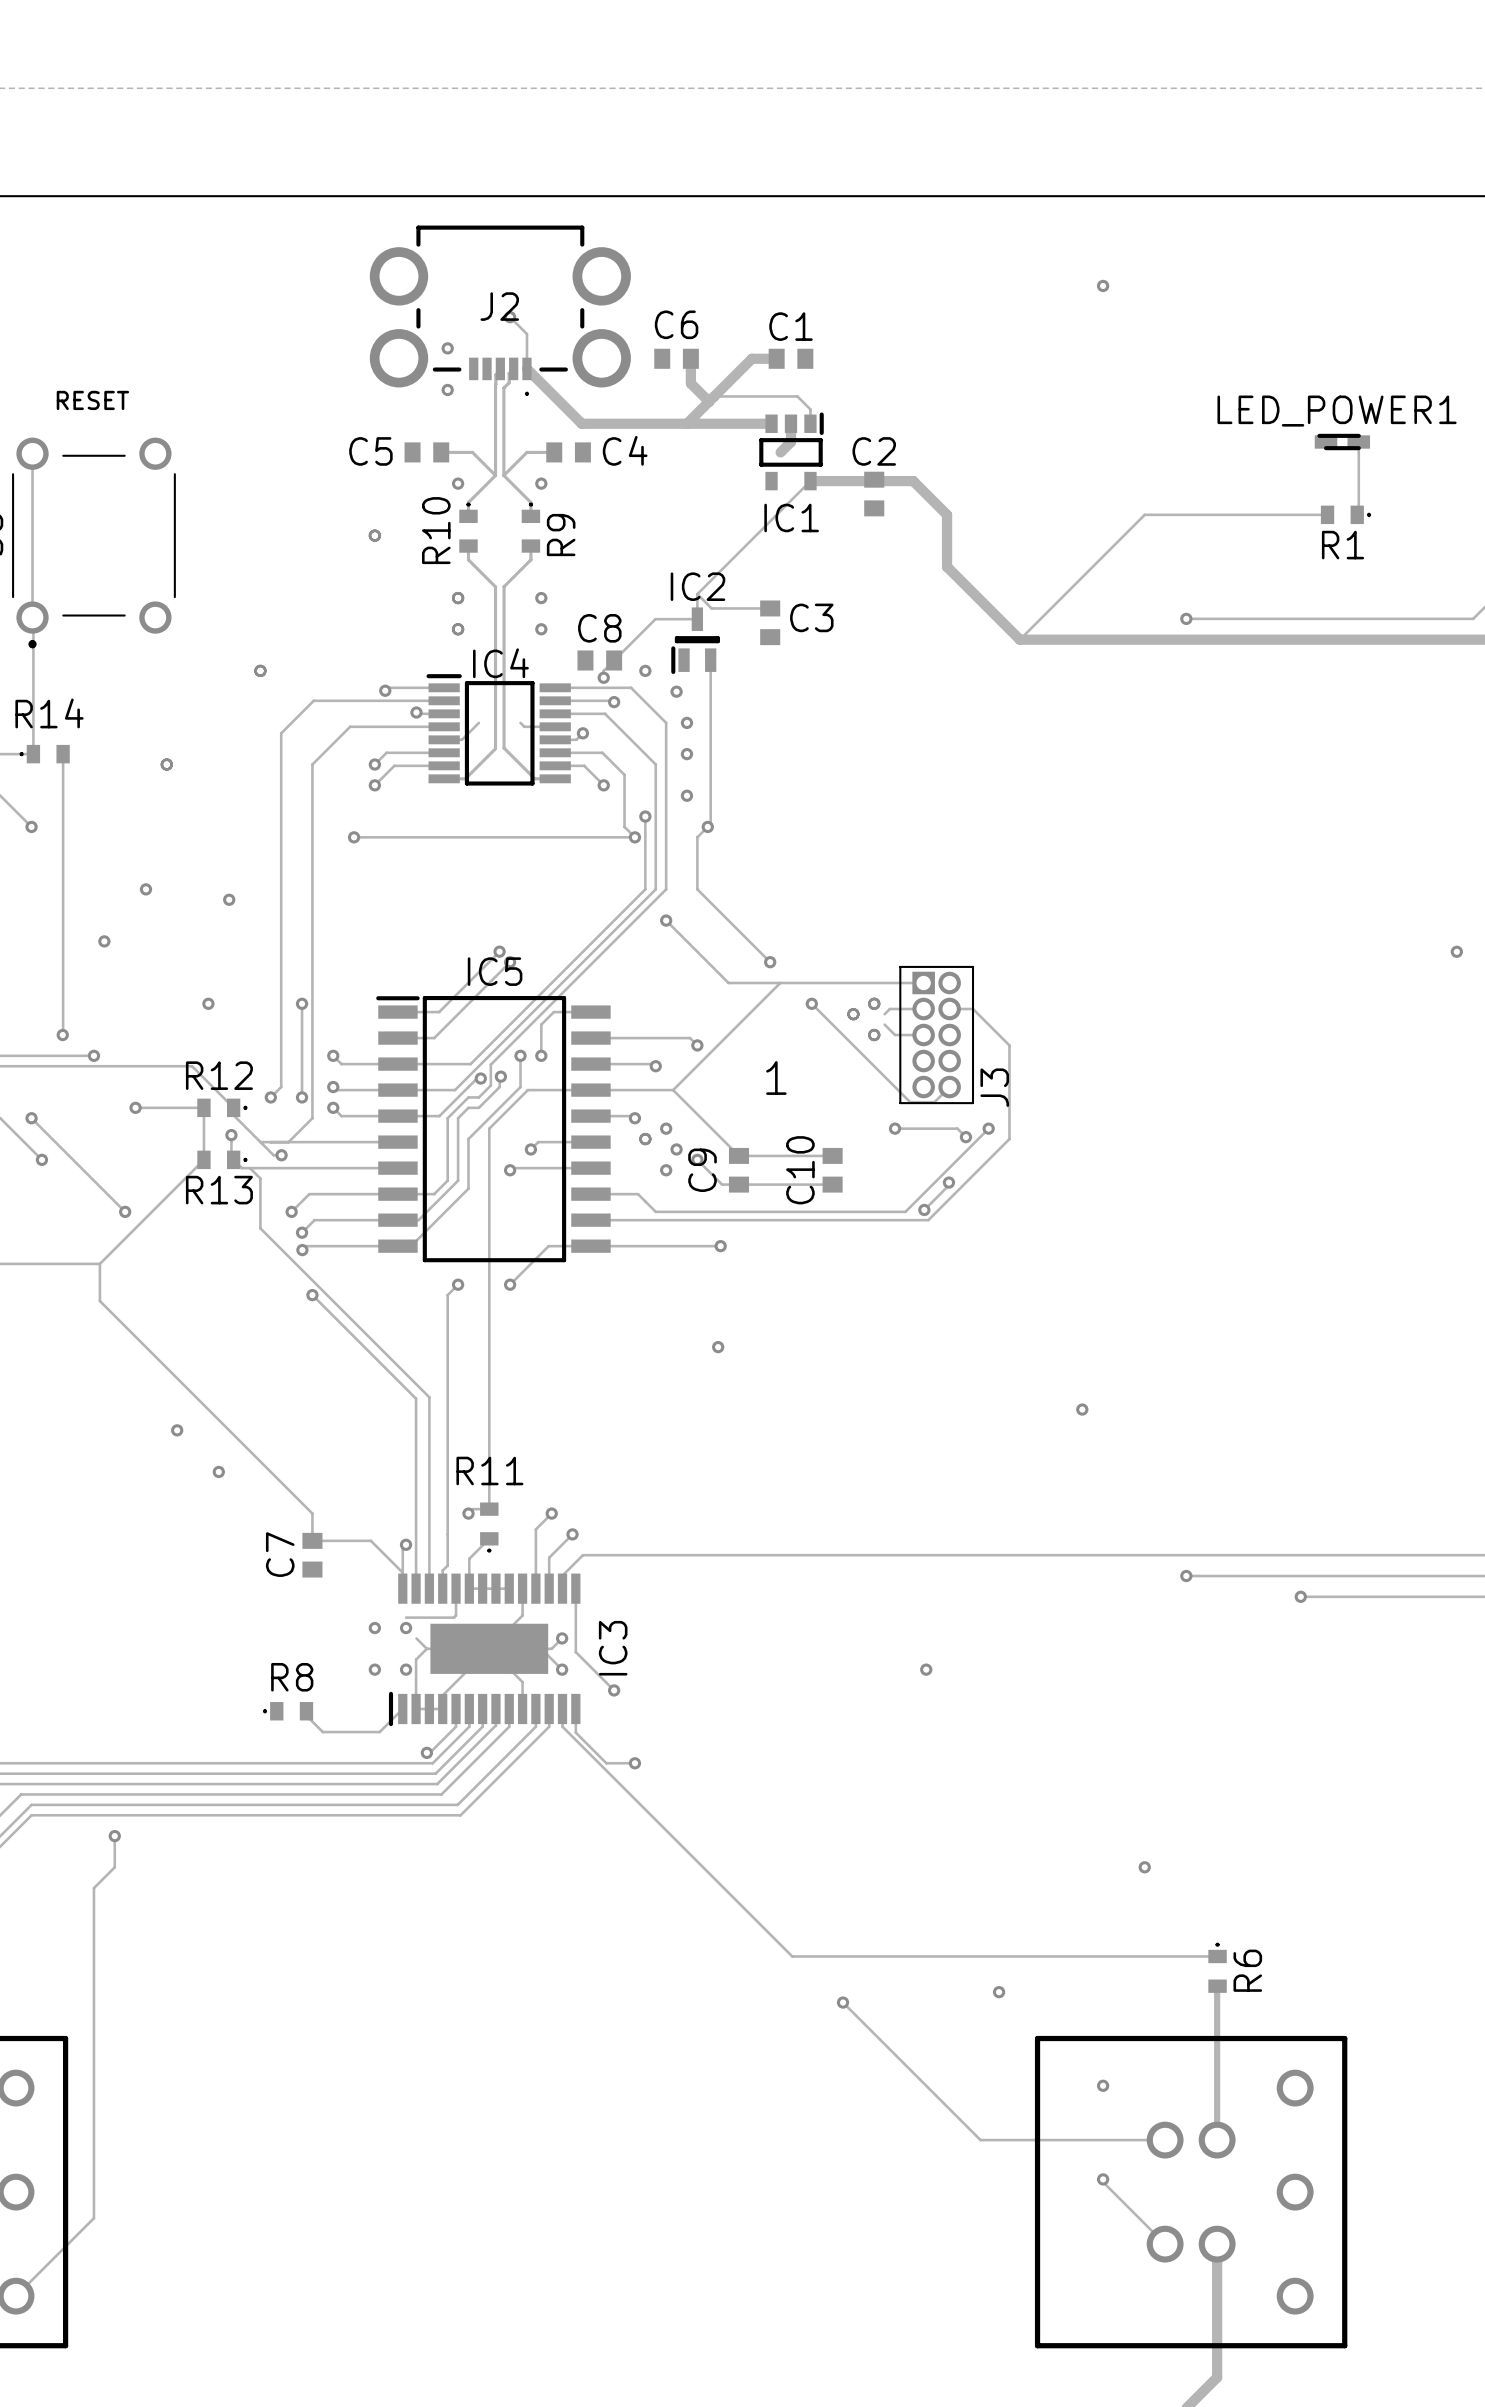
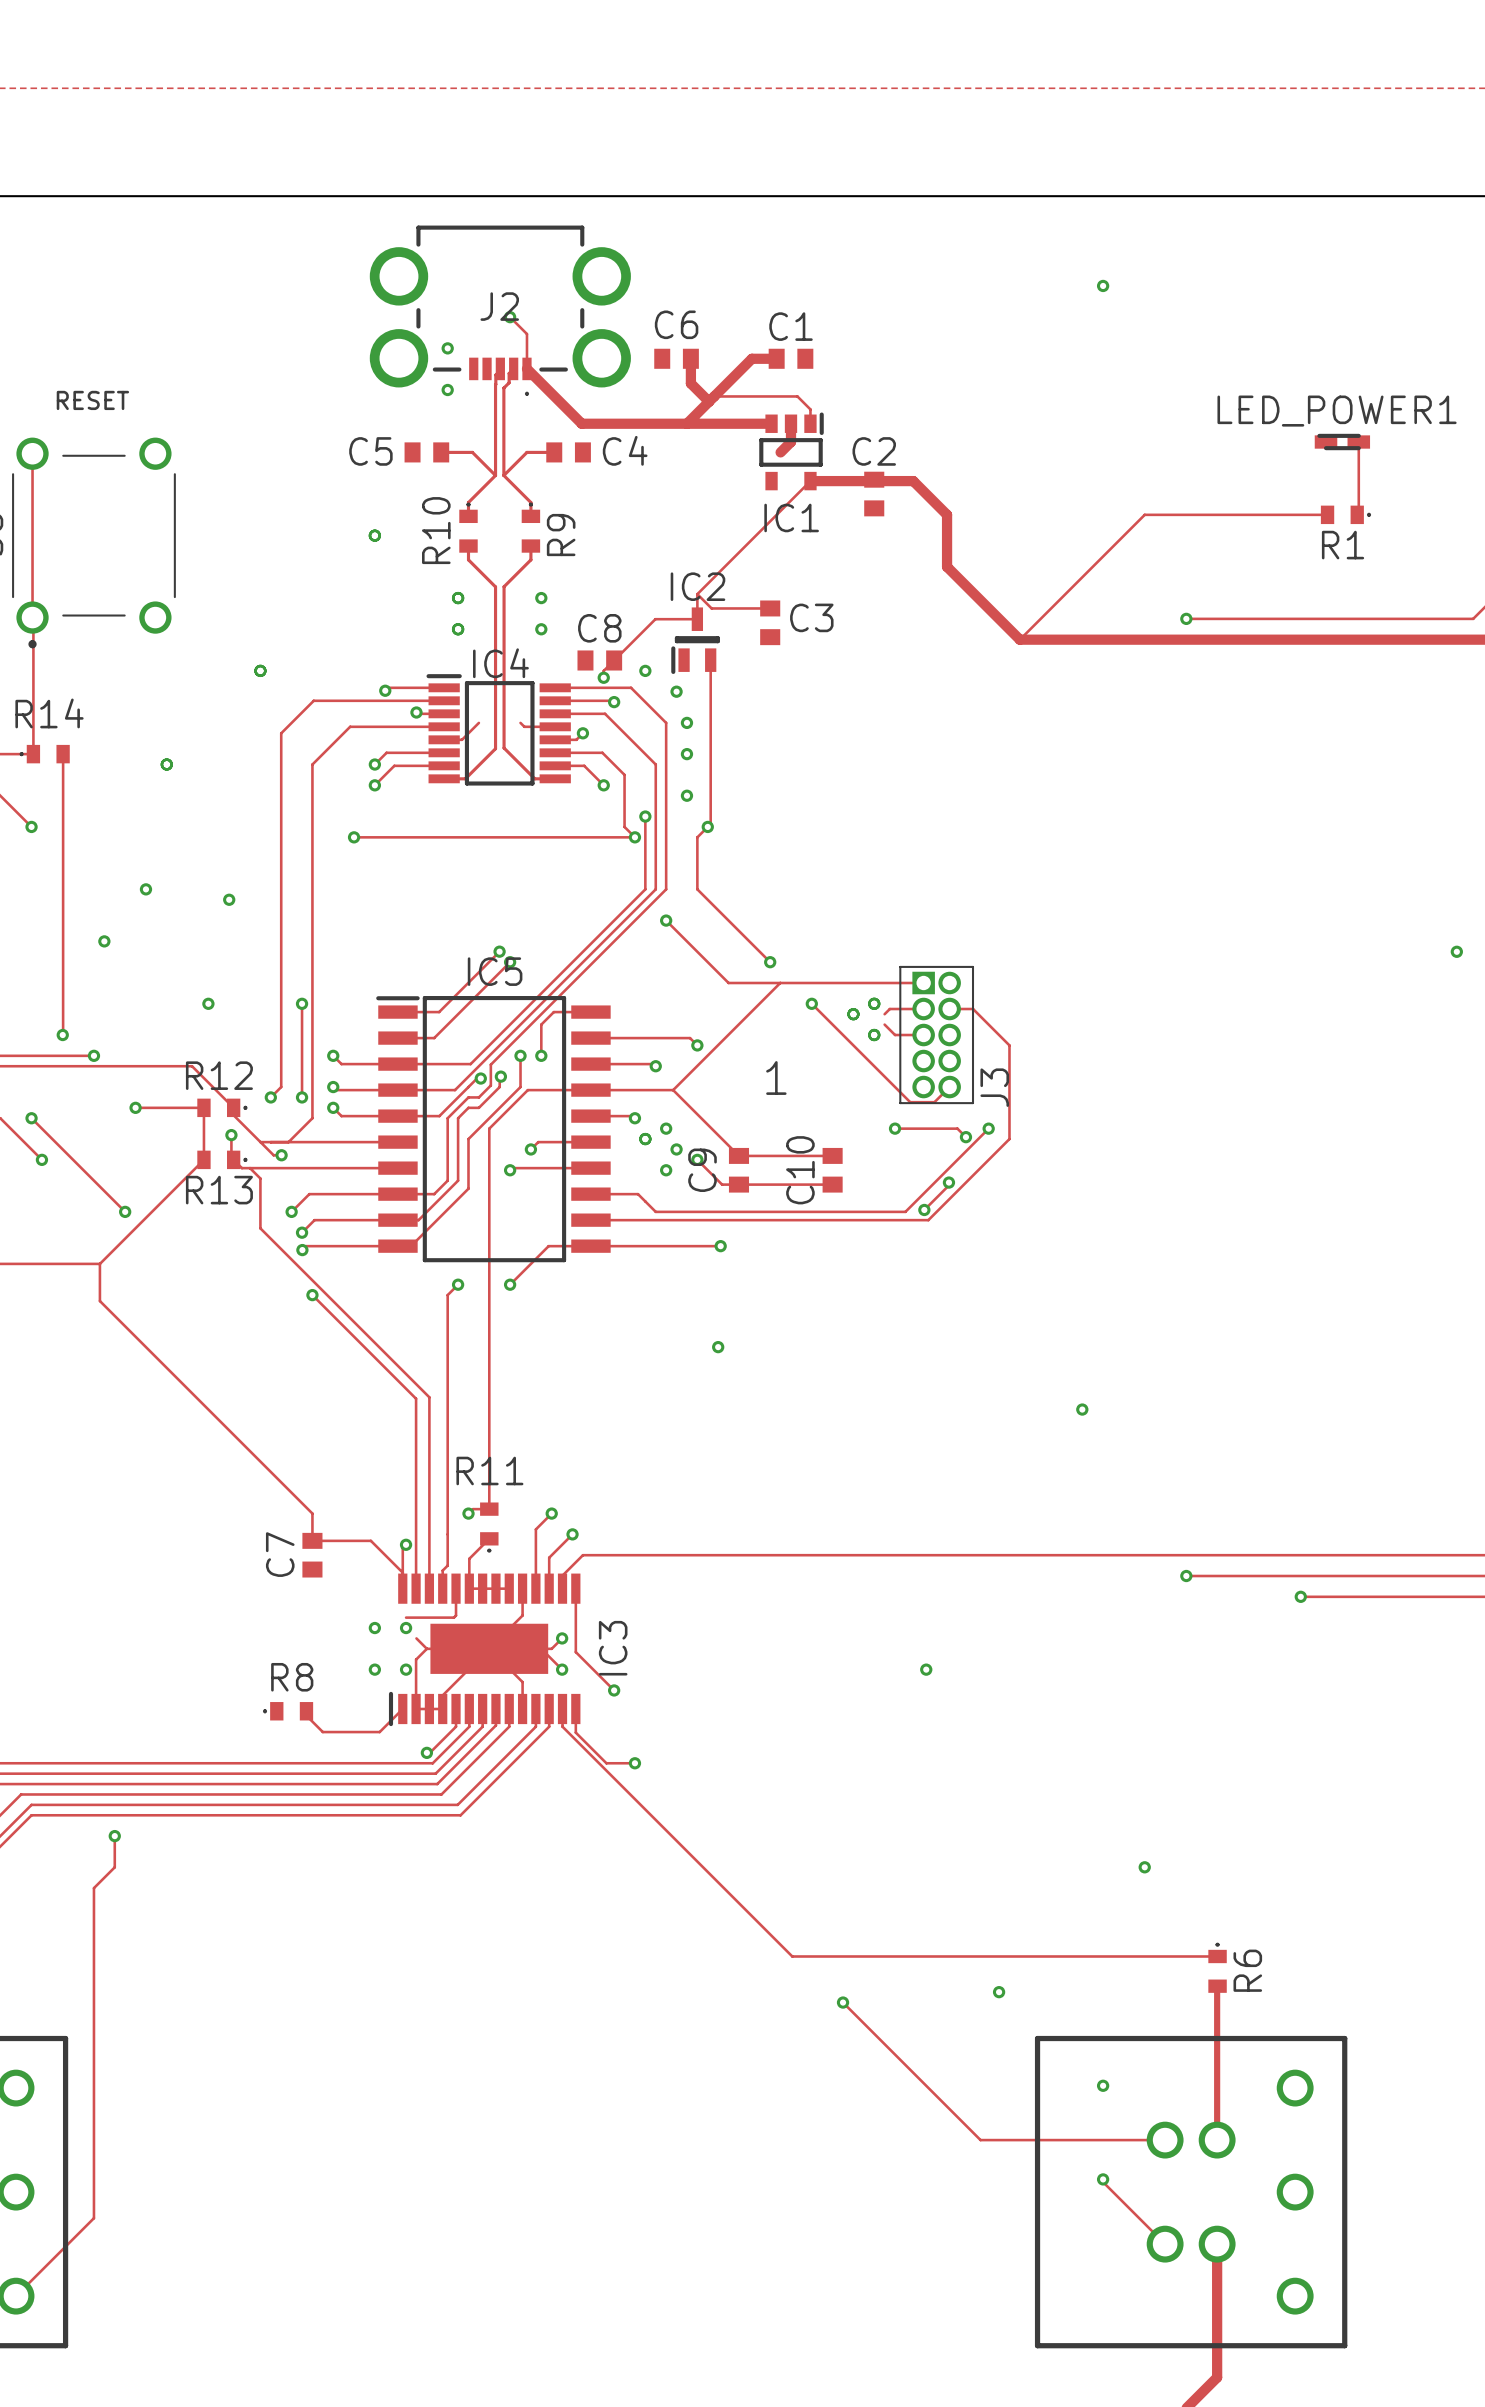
via: (458, 483) -> none
via: (541, 483) -> none
via: (177, 1430) -> none
via: (218, 1471) -> none

